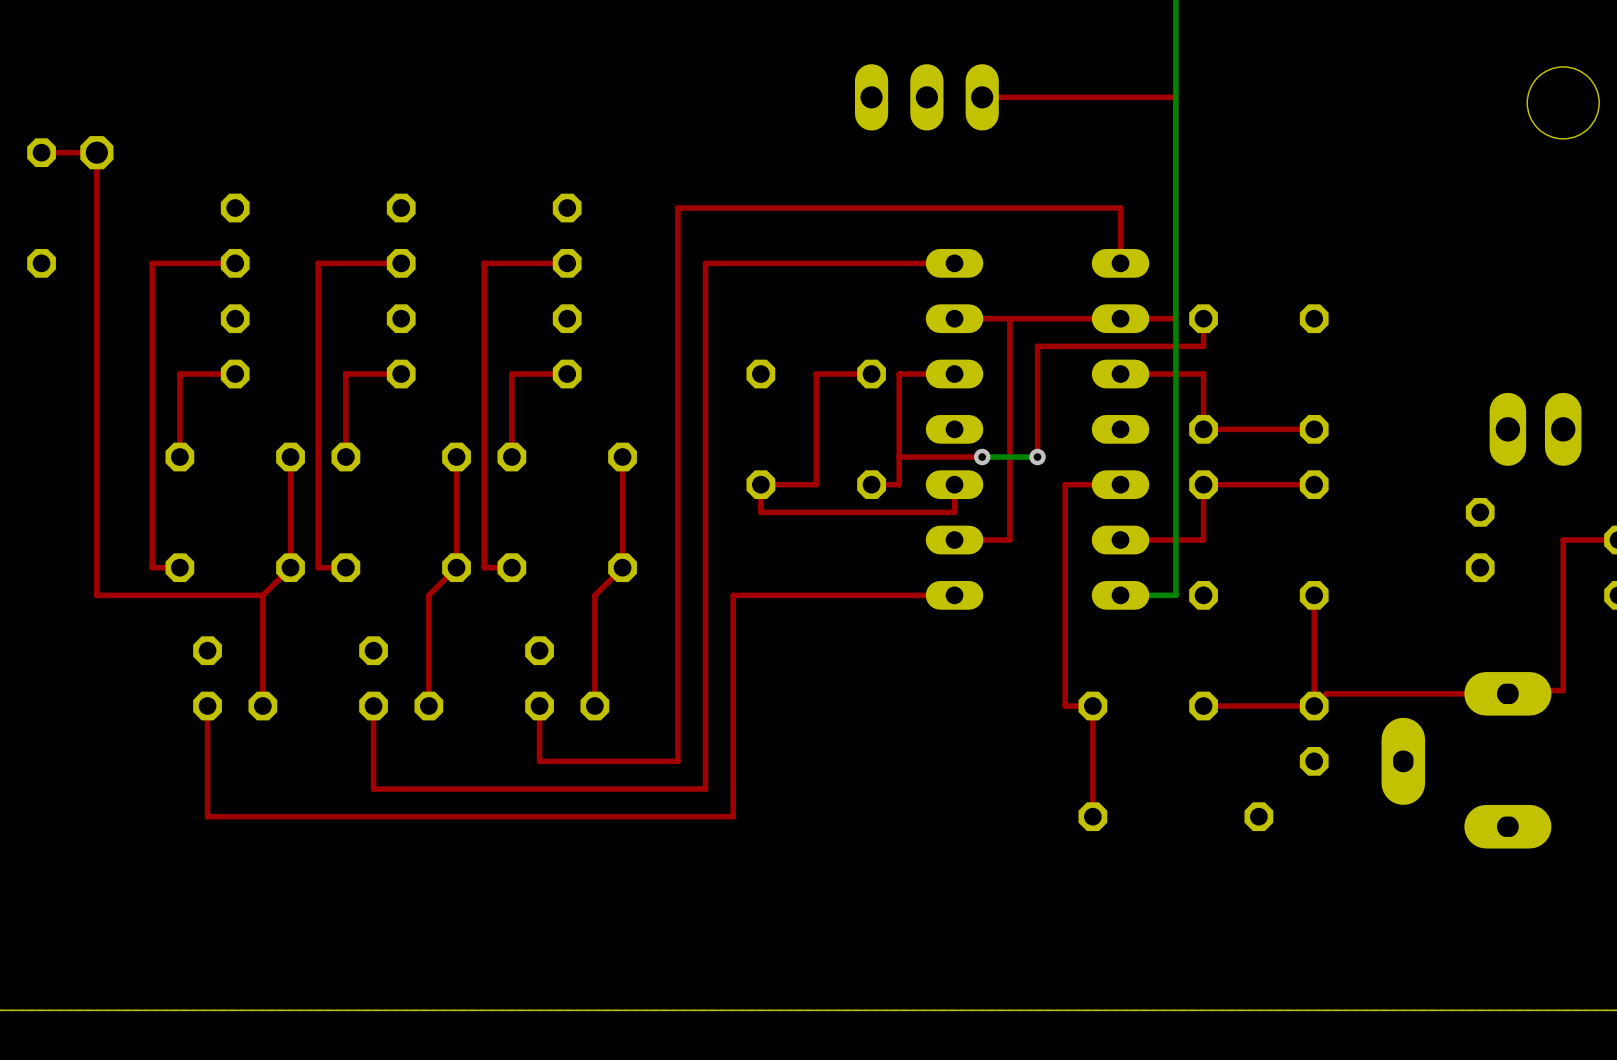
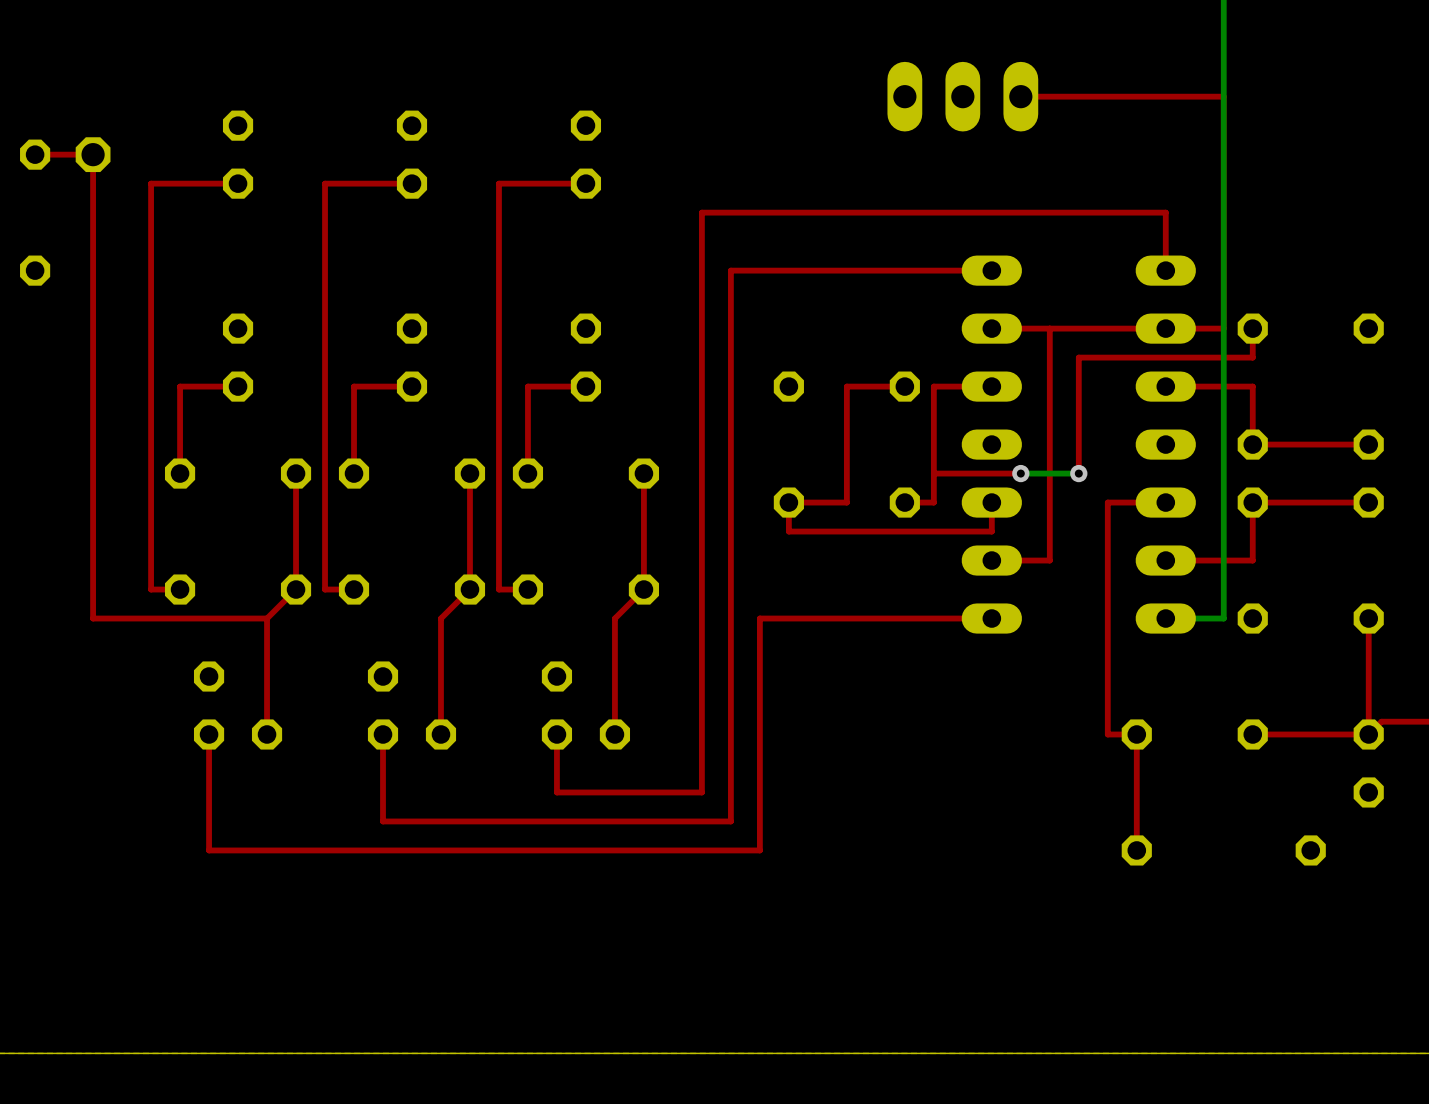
part position: (235, 235) -> (238, 154)
part position: (401, 235) -> (411, 154)
part position: (567, 235) -> (585, 154)
top track: (235, 263) (152, 263) -> (238, 183) (151, 183) (151, 270)
top track: (401, 263) (318, 263) -> (411, 183) (325, 183) (325, 270)
top track: (567, 263) (484, 263) -> (585, 183) (498, 183) (498, 270)

